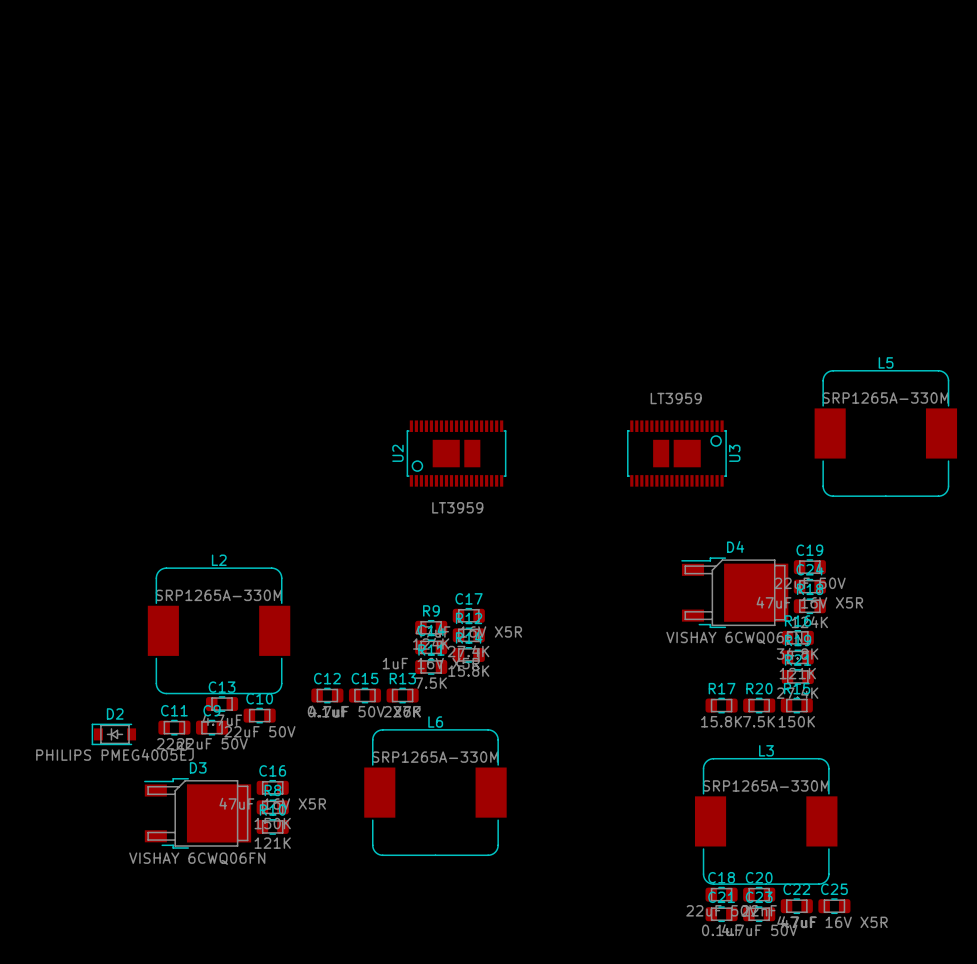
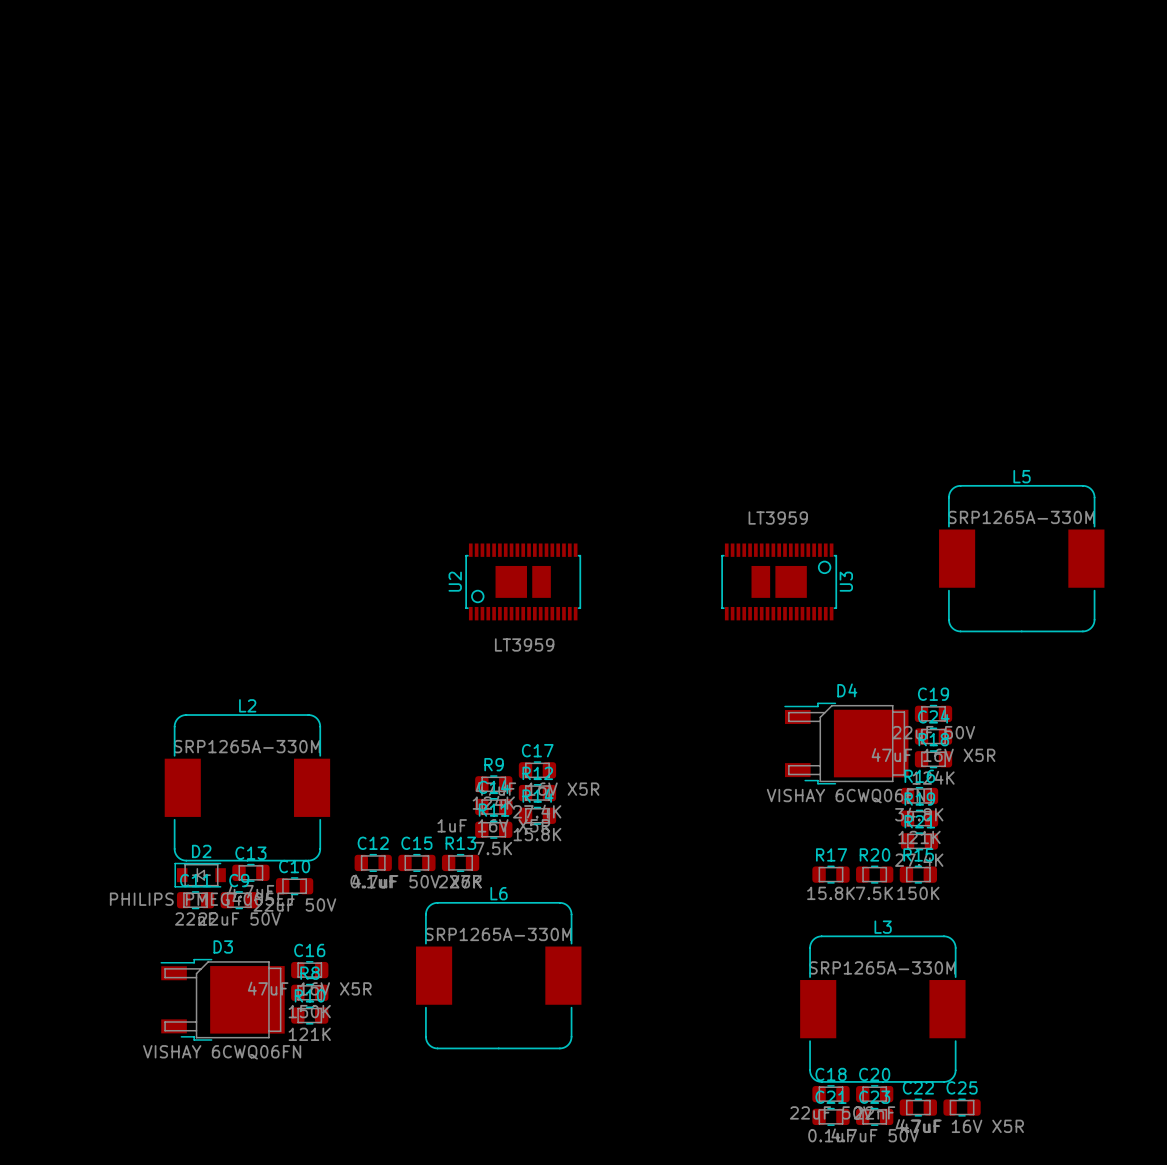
D2 position: (113, 734) -> (200, 875)

